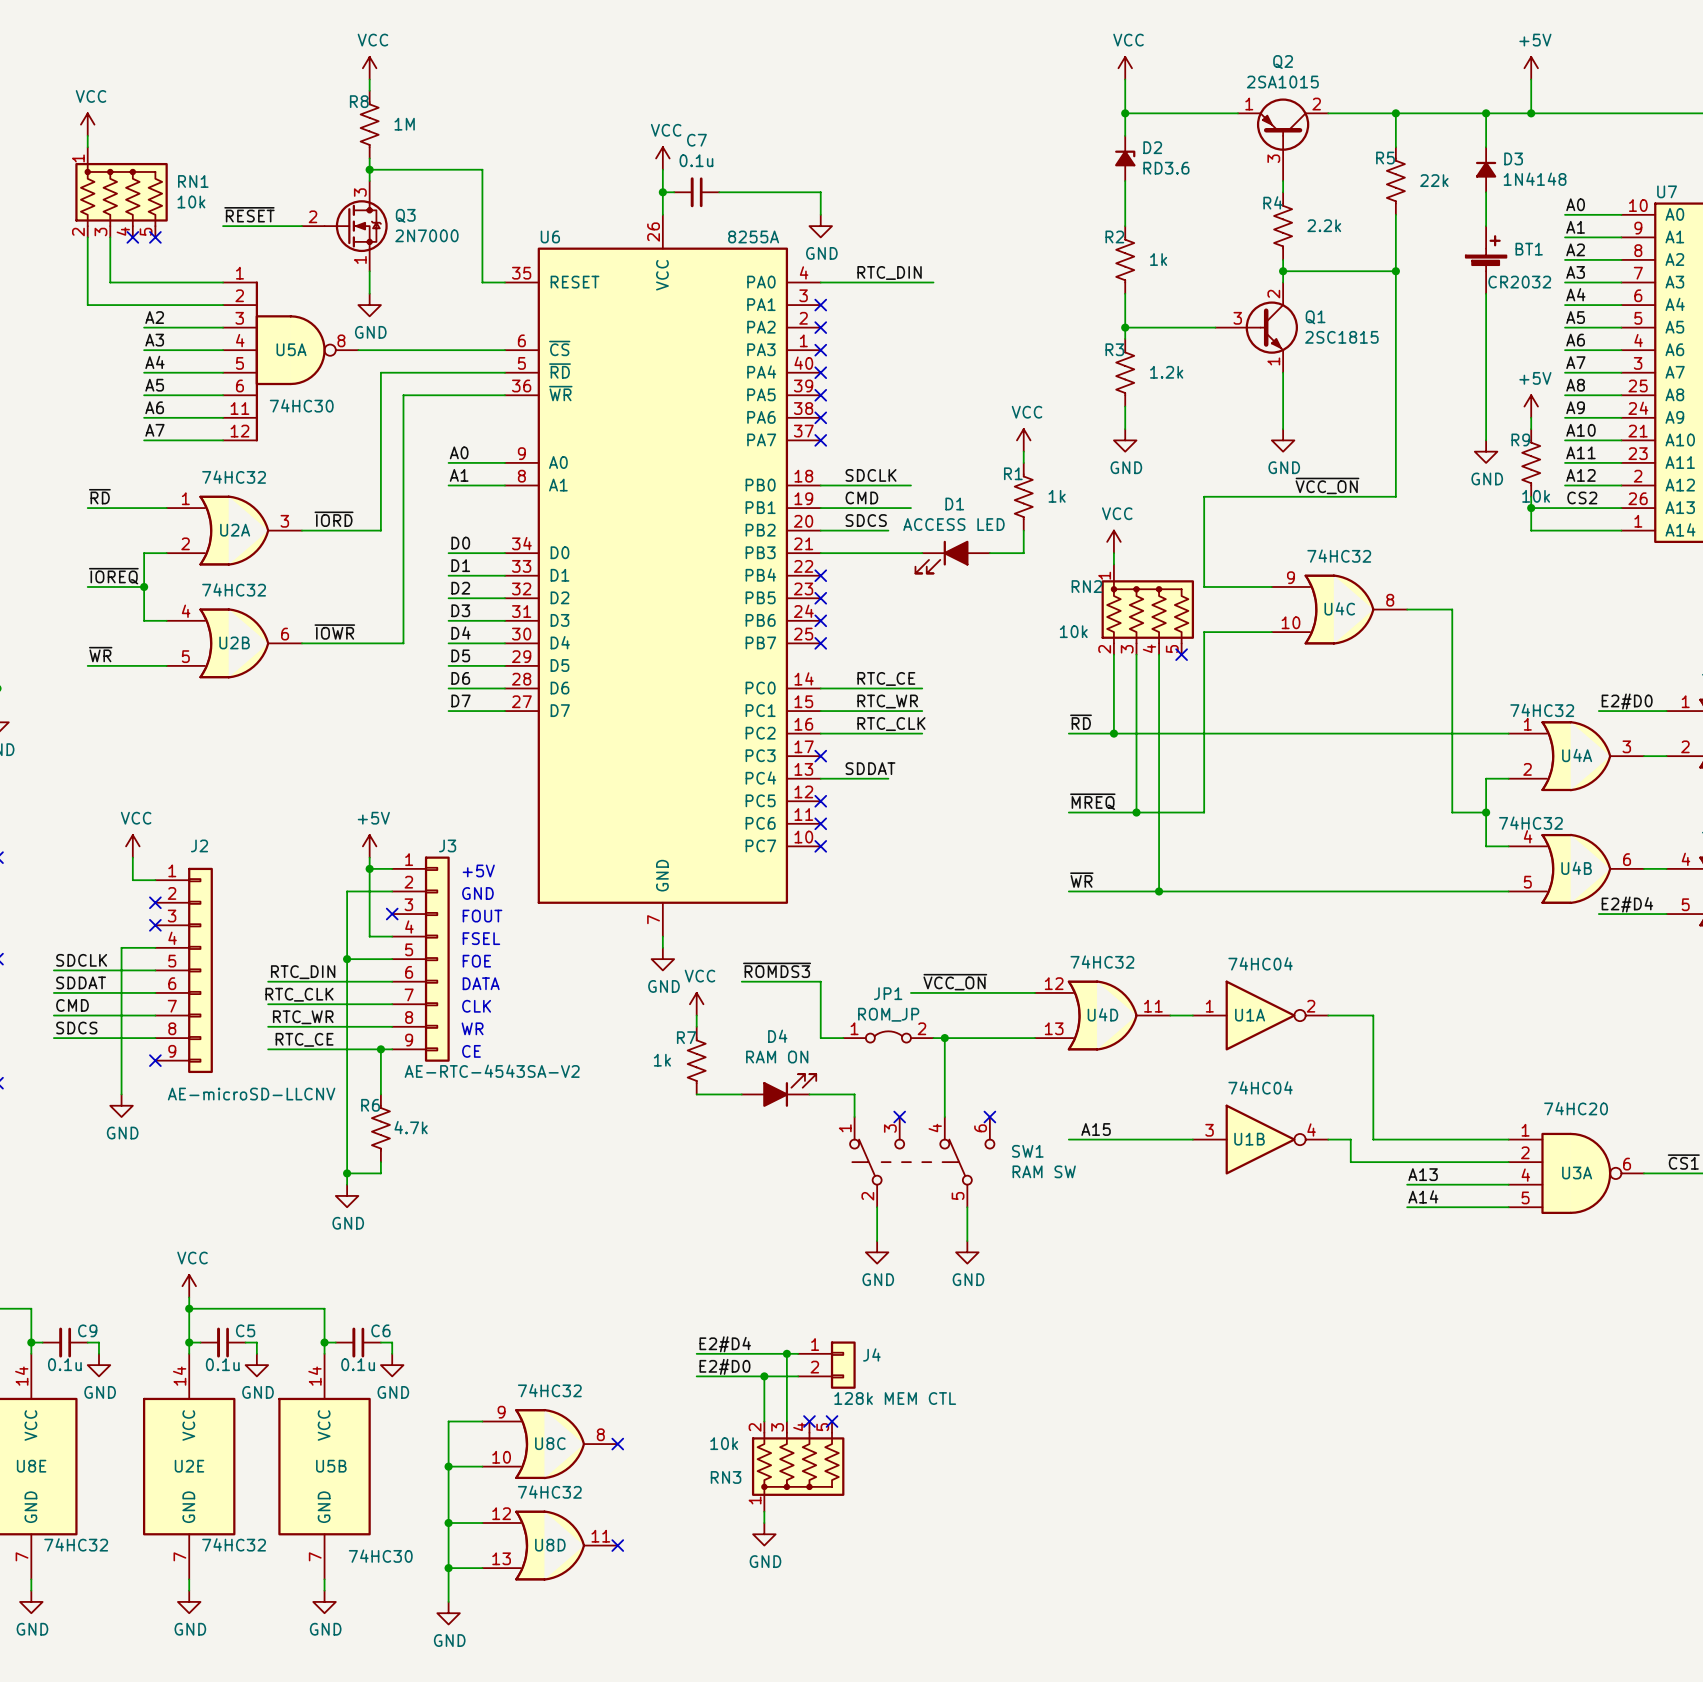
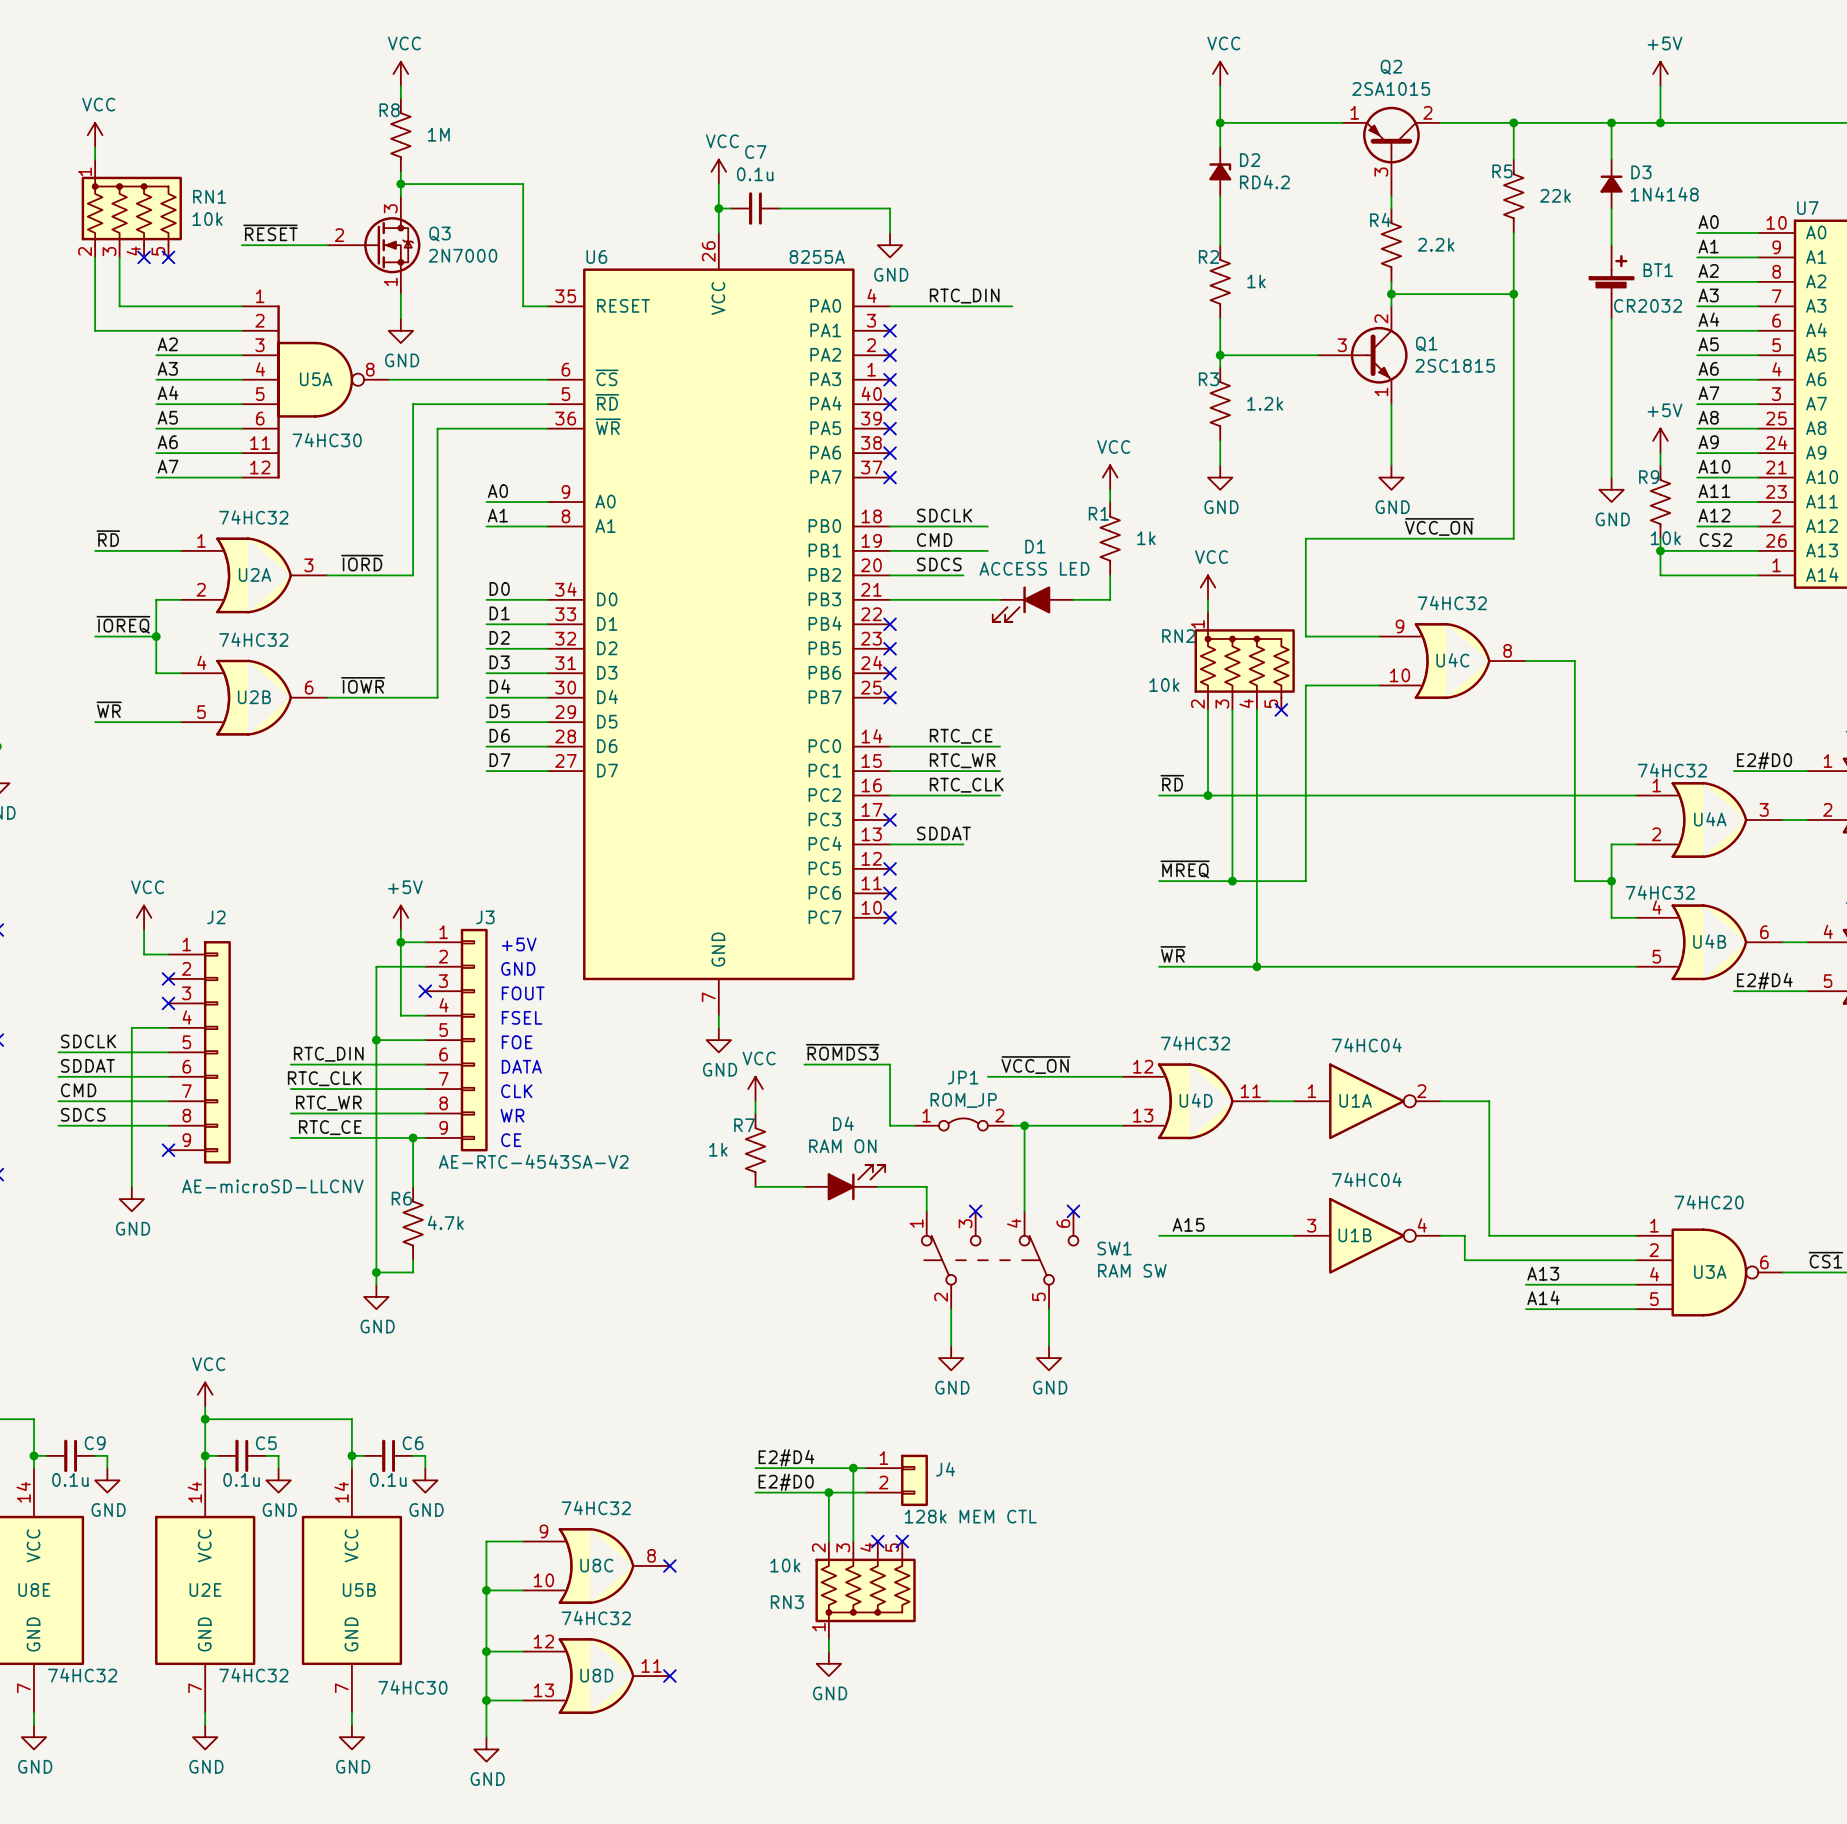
D2 value: RD3.6 (1166, 168) -> RD4.2 (1264, 182)

